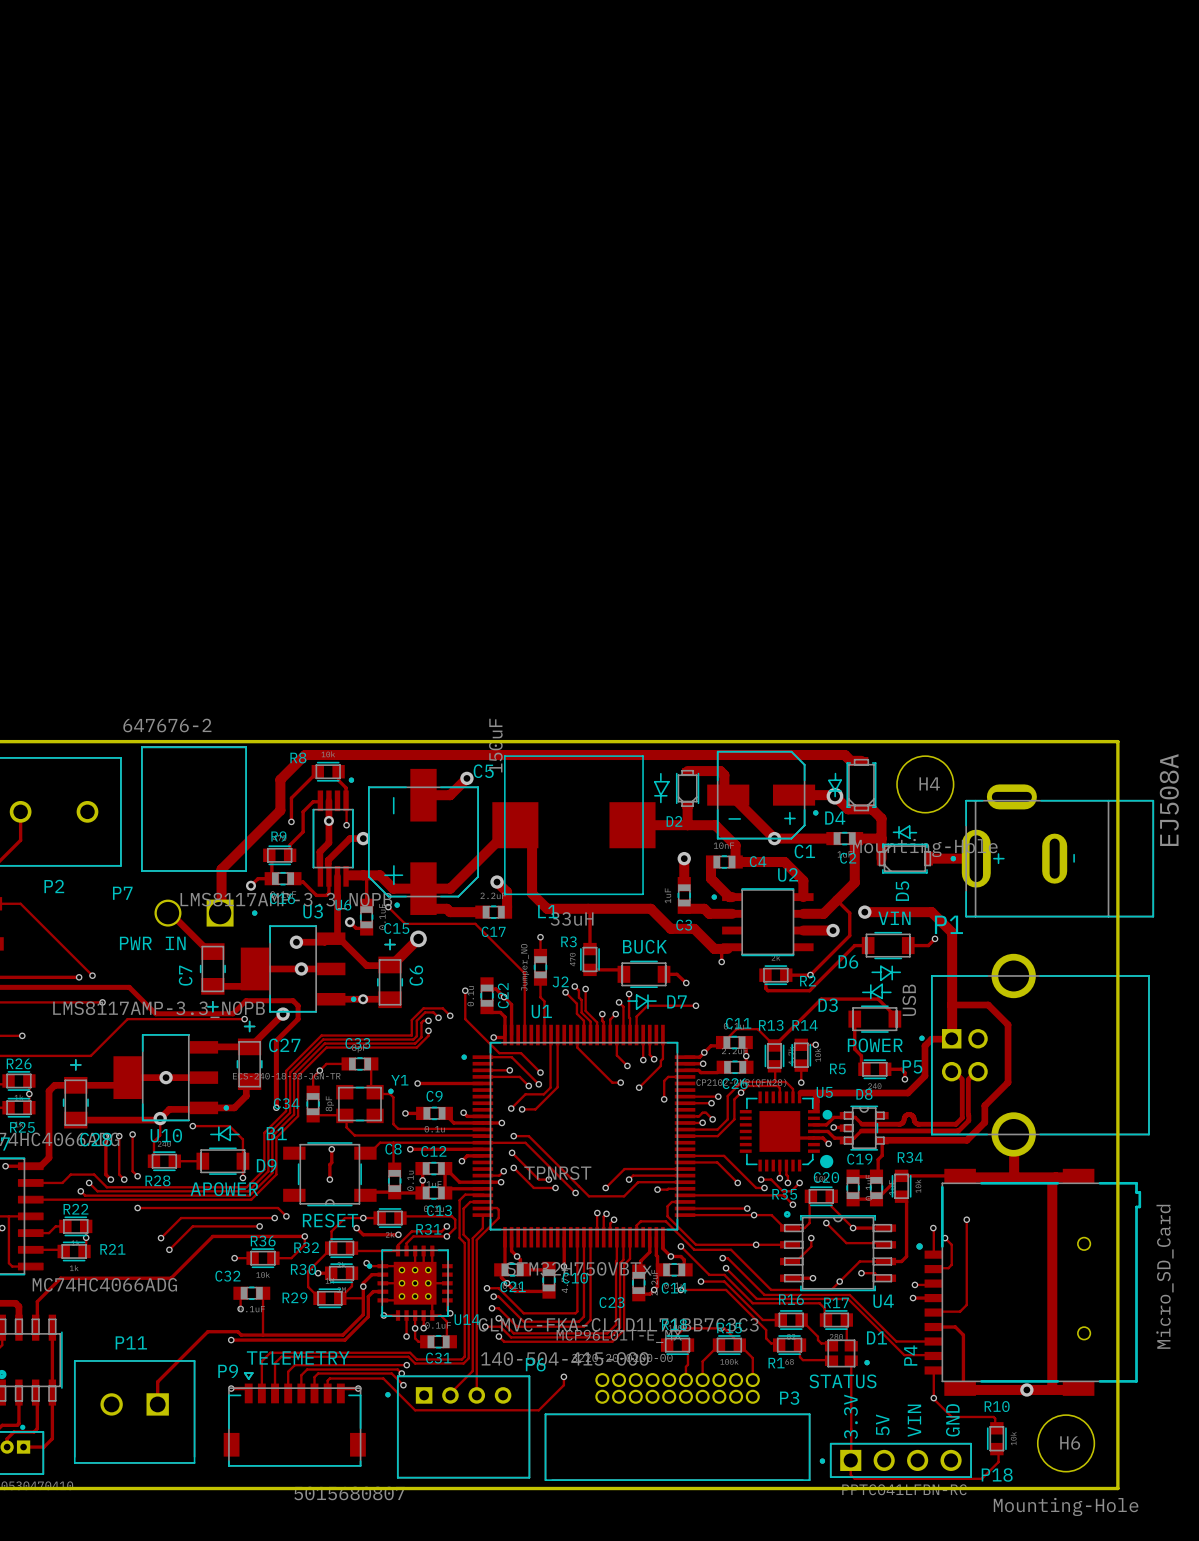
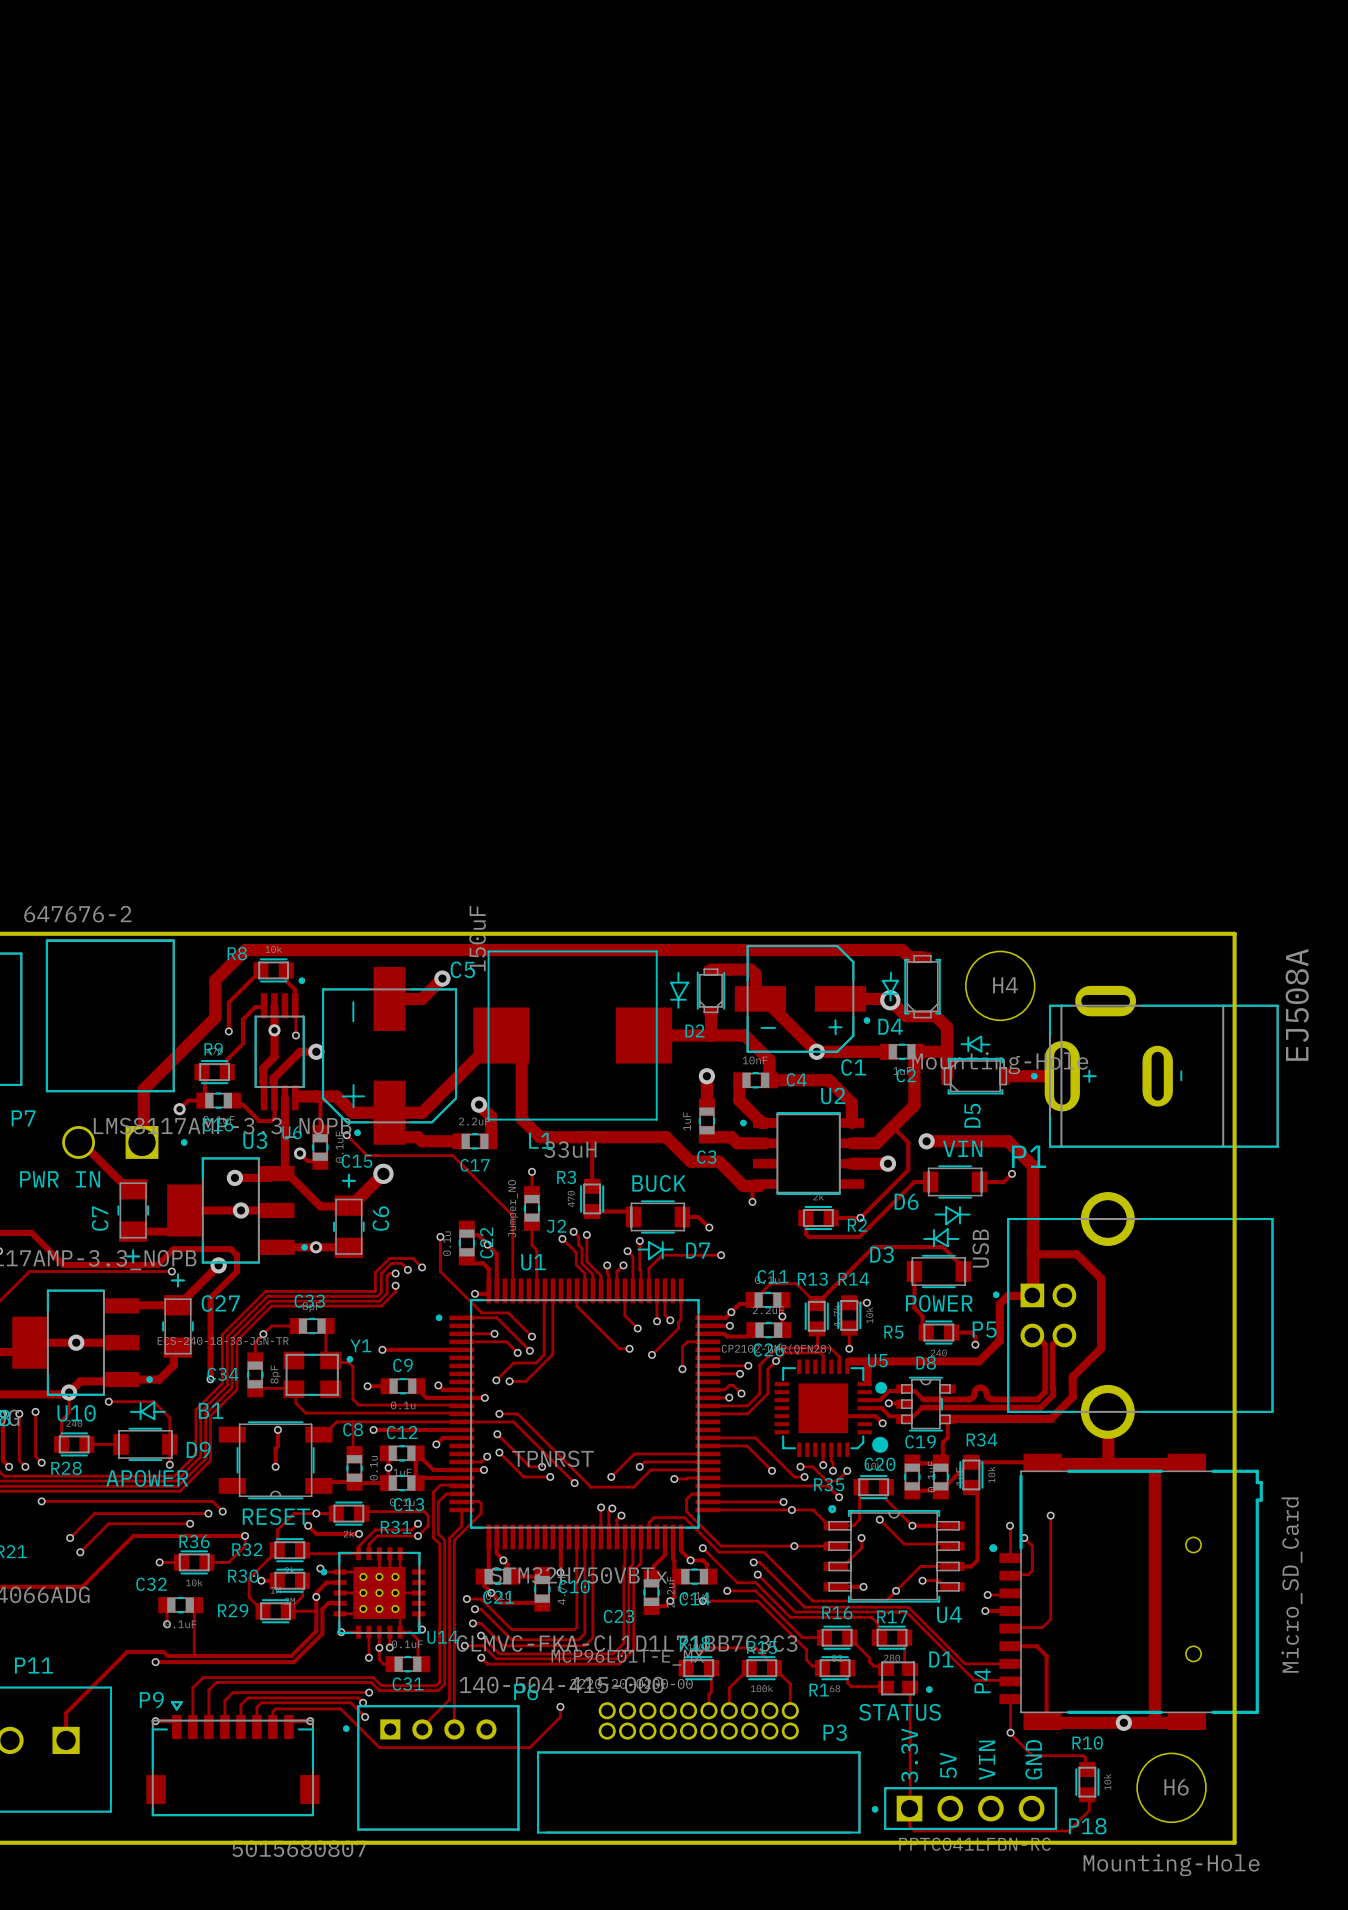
text: TELEMETRY (298, 1357) -> none

